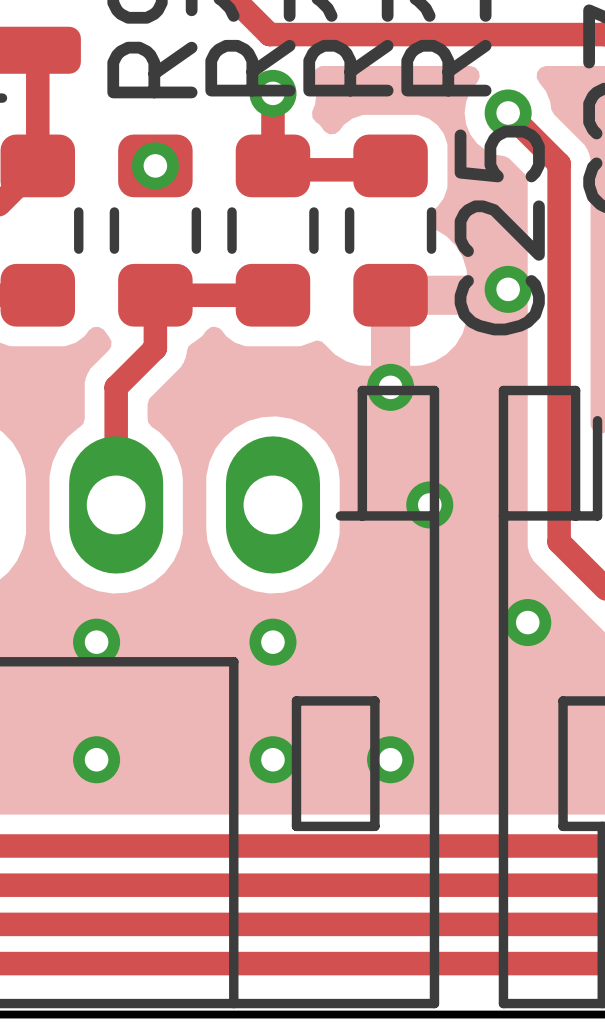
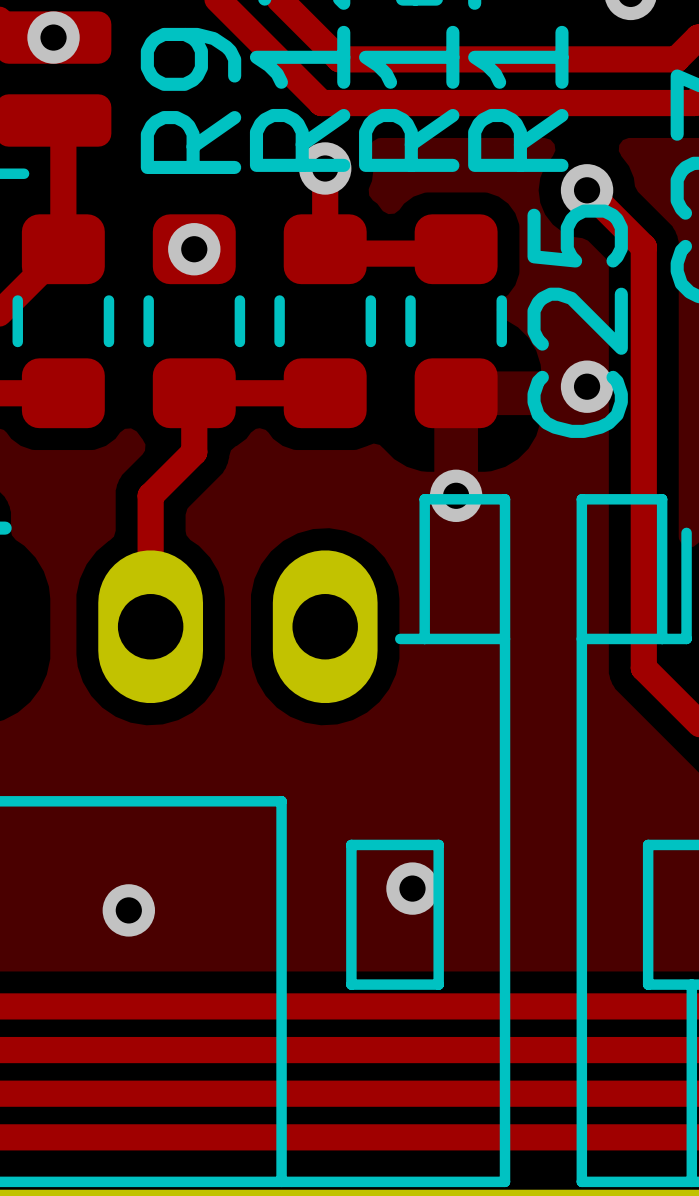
via: (429, 504) -> none
via: (527, 622) -> none
via: (96, 642) -> none
via: (272, 642) -> none
via: (272, 759) -> none
via position: (390, 759) -> (412, 888)

